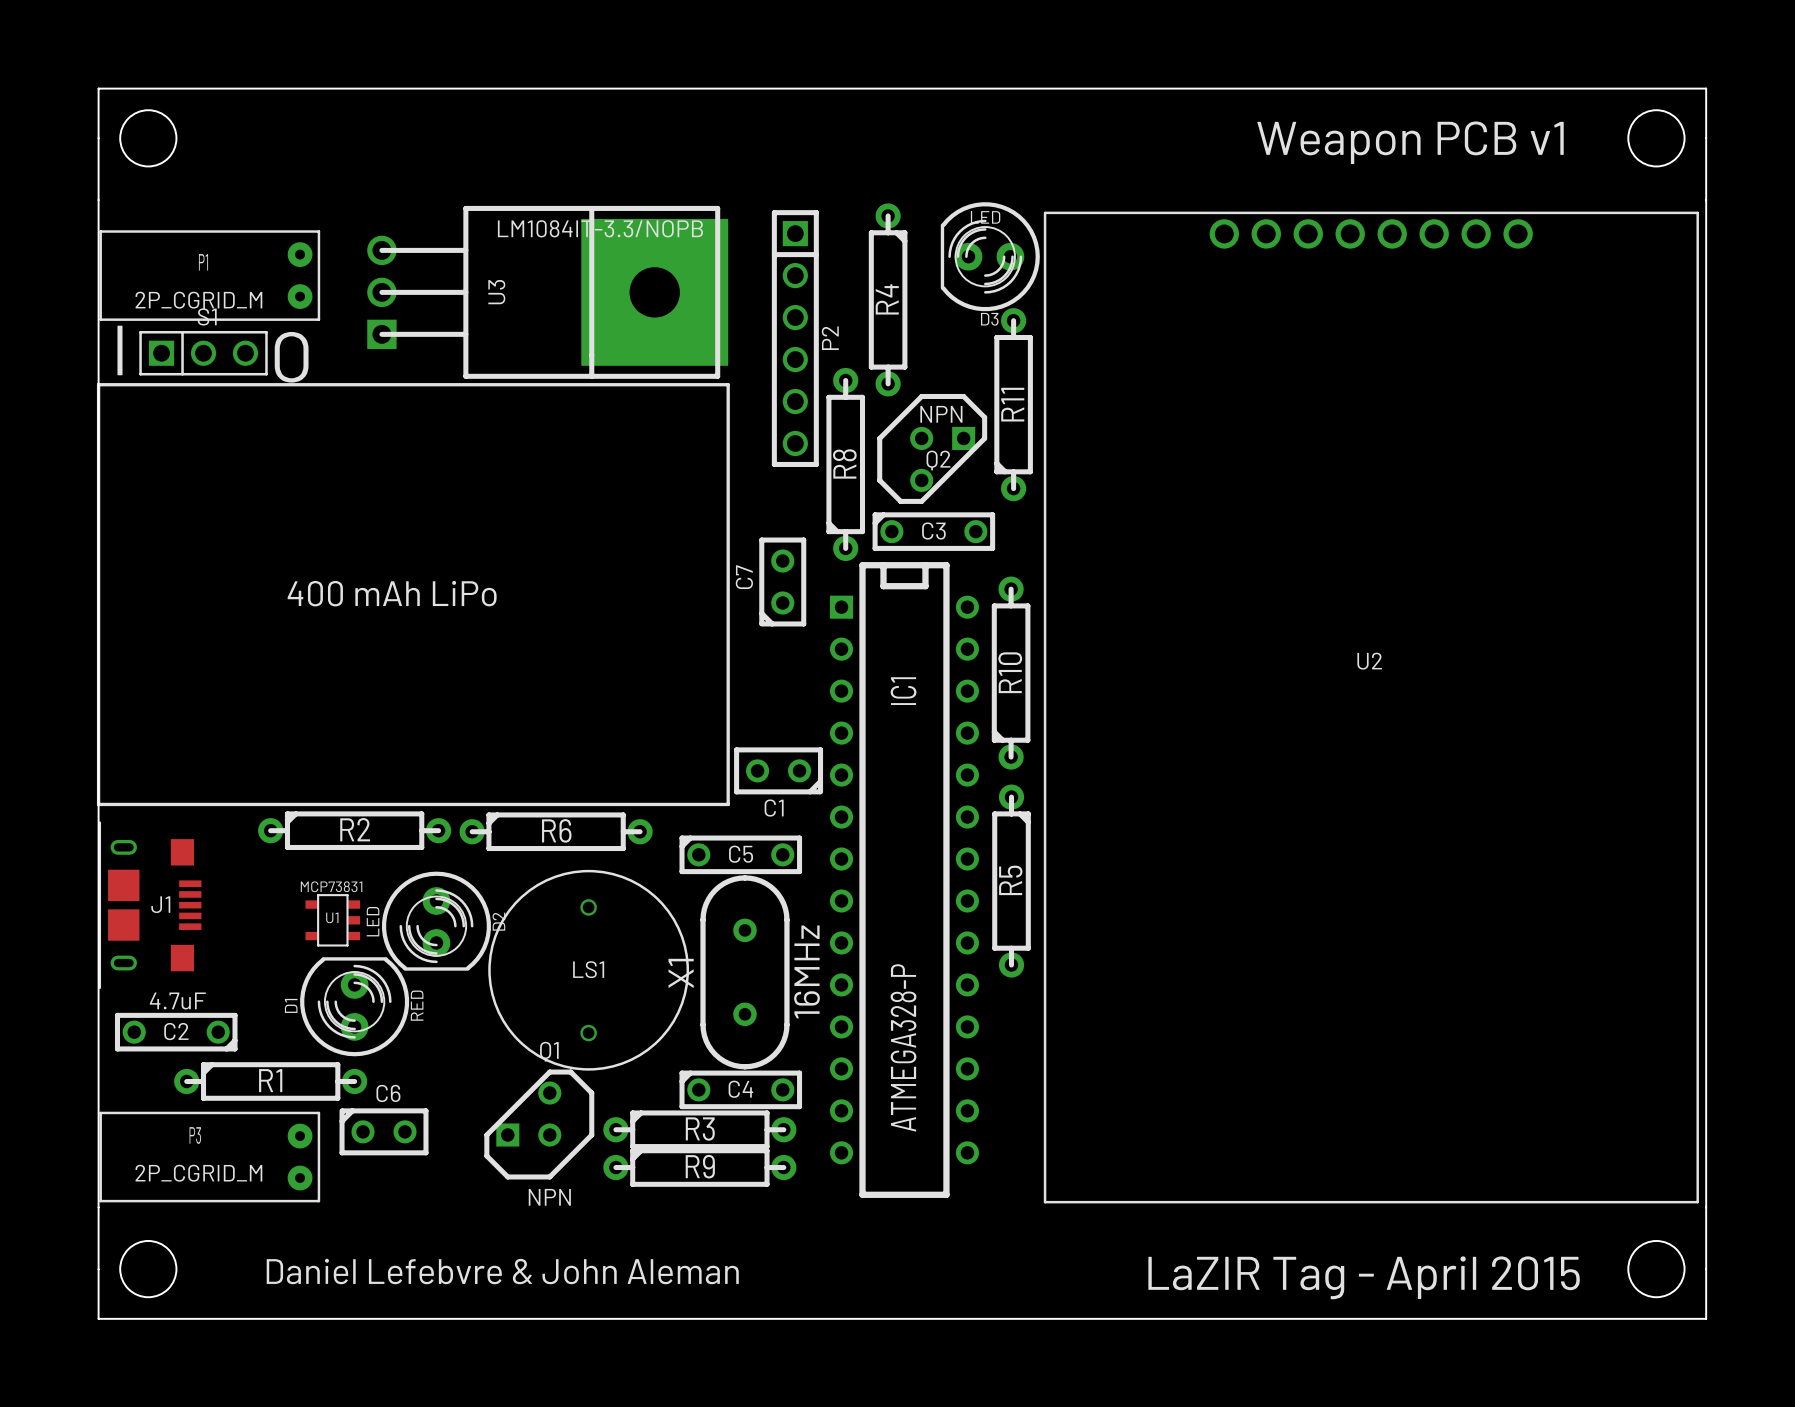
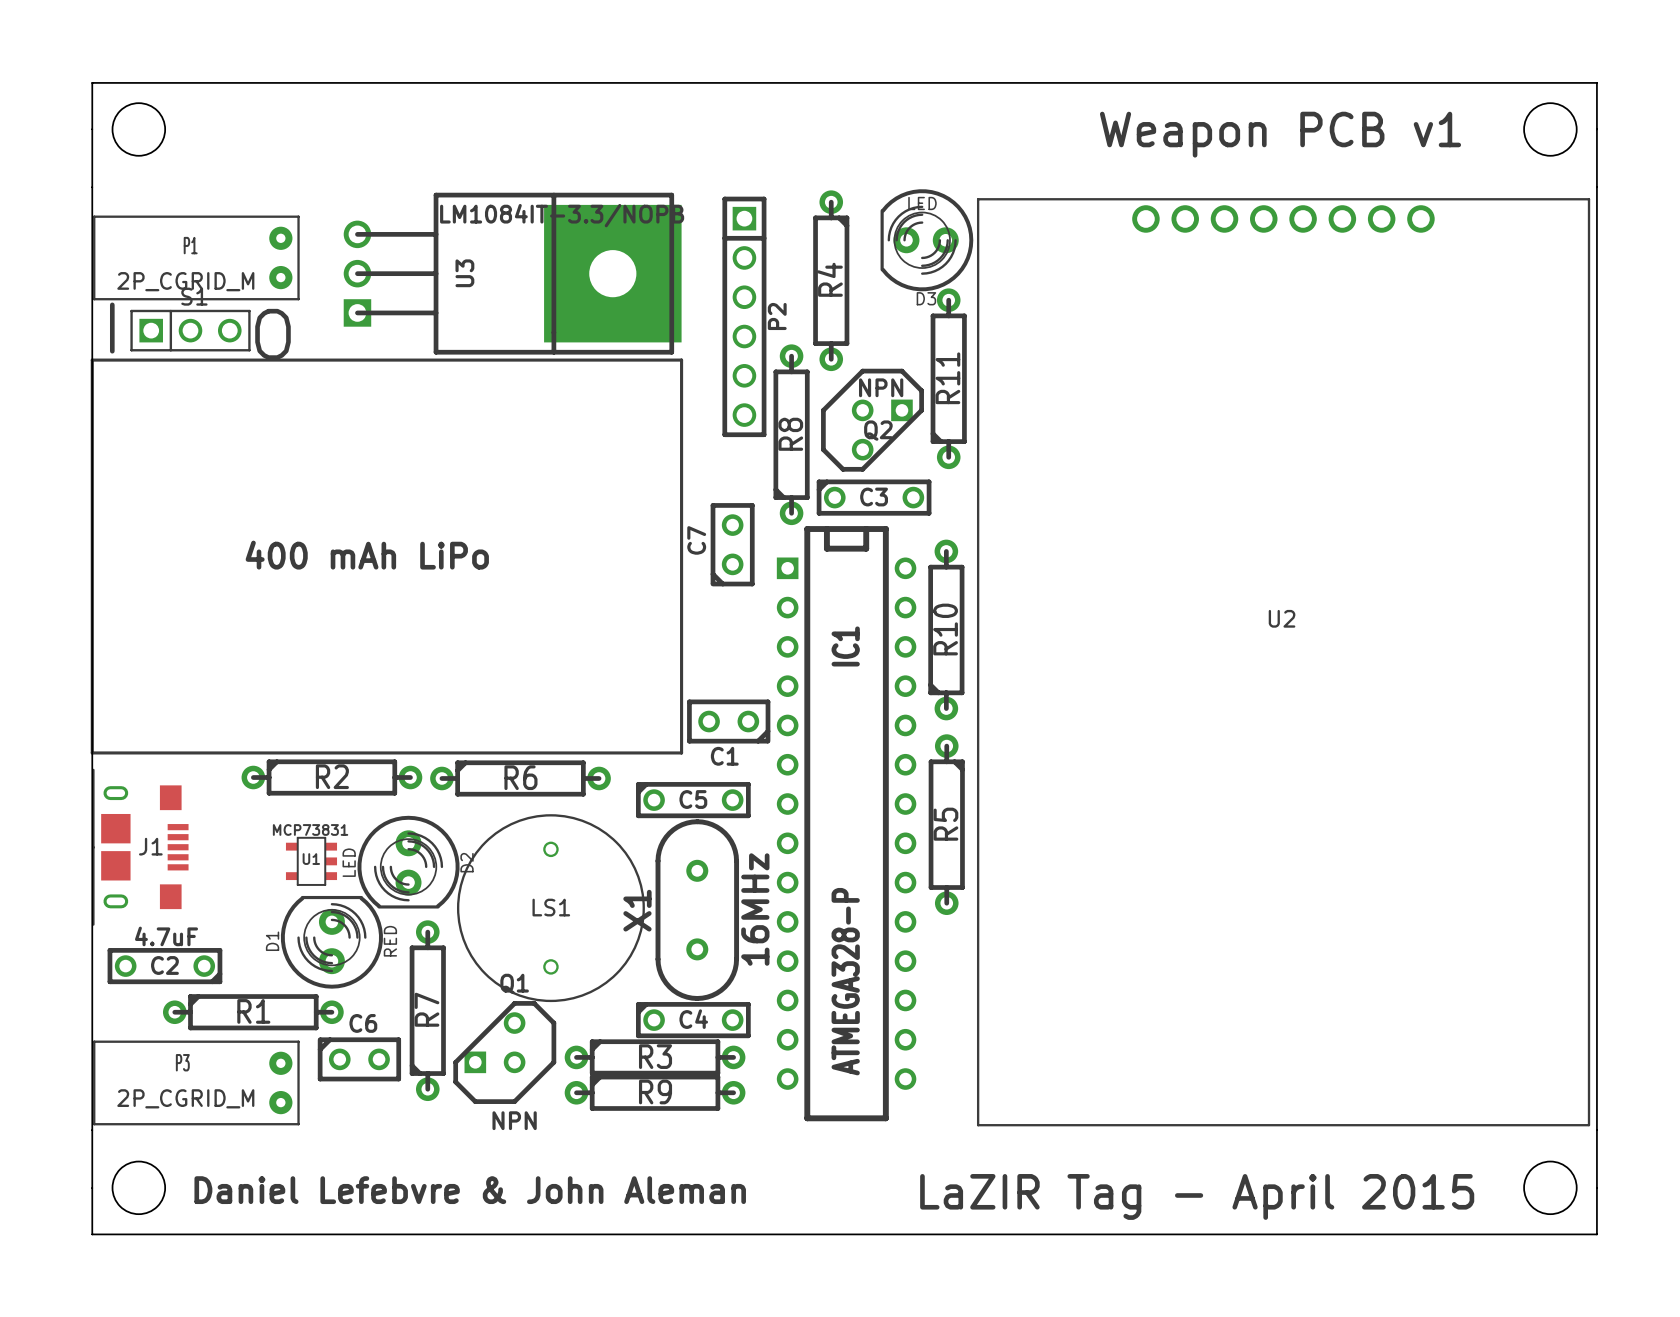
R7: none -> (427, 1010)

